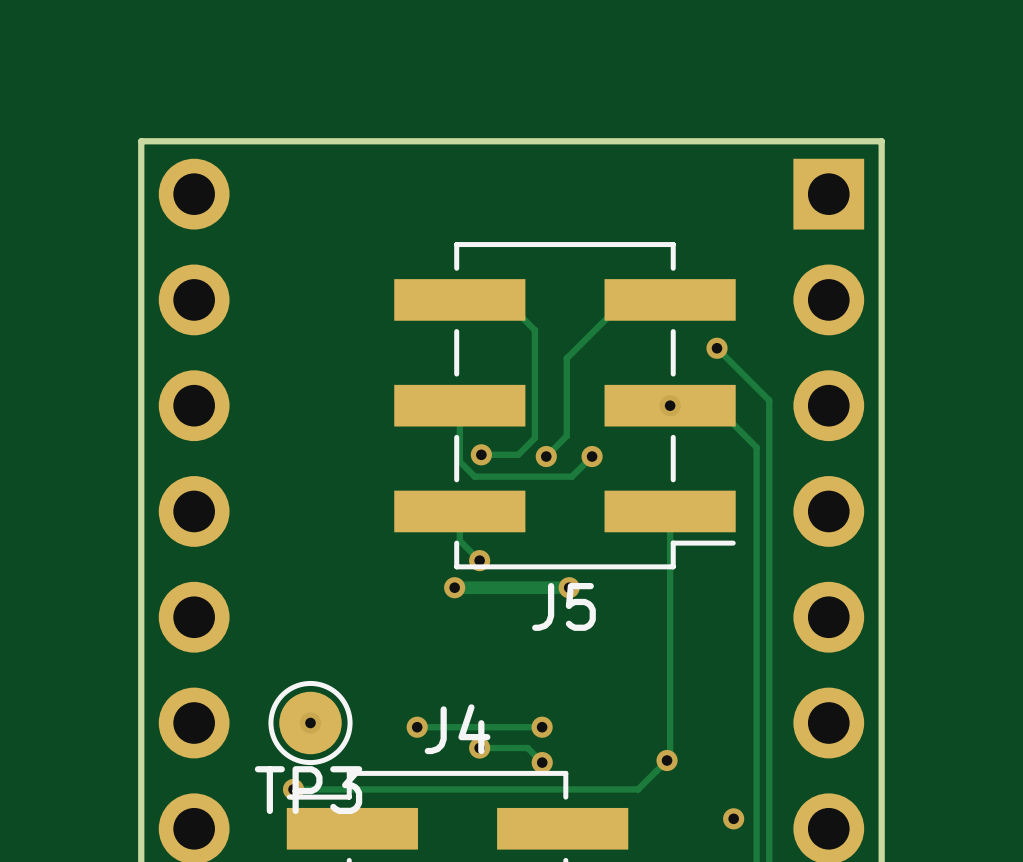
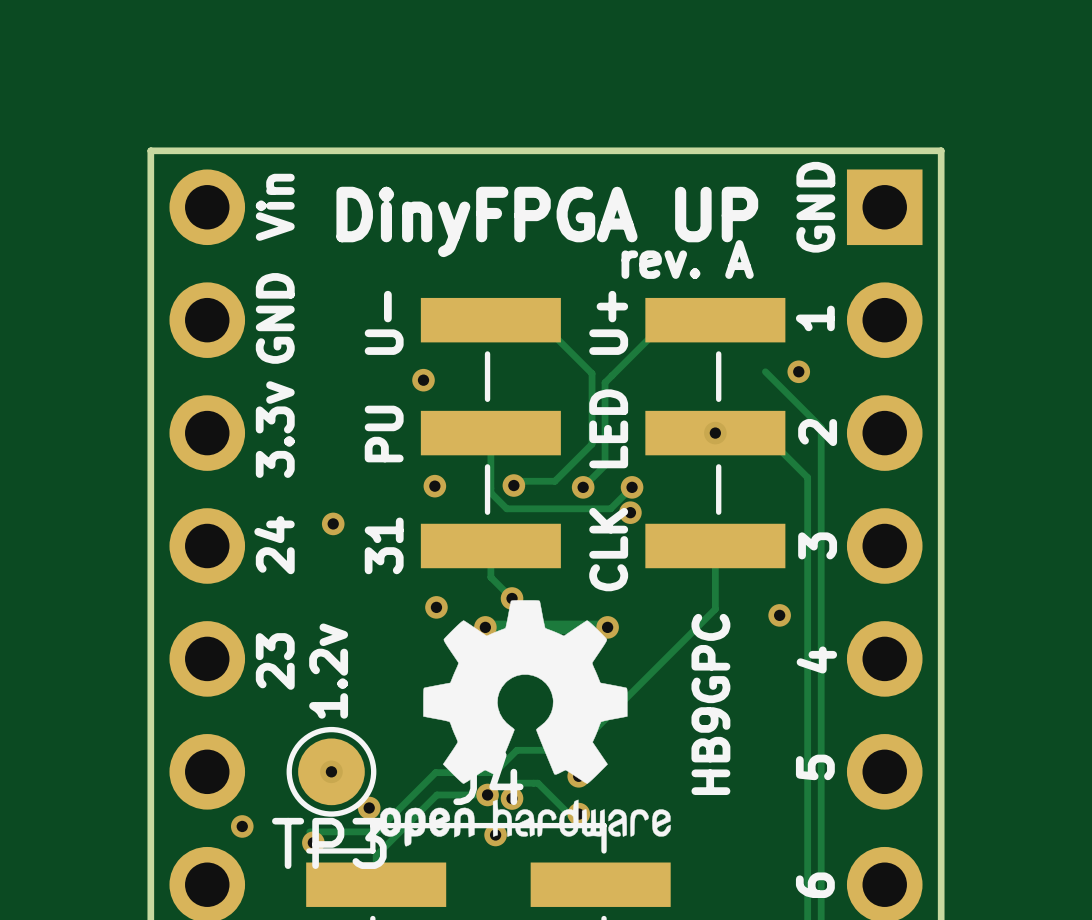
text: none -> Vin (275, 207)
text: none -> GND (815, 207)
text: none -> DinyFPGA UP (547, 221)
text: none -> rev. A (687, 259)
text: none -> GND (275, 318)
text: none -> 1 (815, 318)
text: none -> U- (384, 322)
text: none -> U+ (608, 322)
track: (534, 330) (534, 438) (518, 454) (481, 454) -> (571, 352) (592, 373) (592, 444) (554, 481) (514, 481)
via position: (717, 348) -> (798, 371)
via: none -> (423, 380)
text: none -> LED (608, 428)
text: none -> 3.3v (275, 429)
J5: (564, 405) -> none
text: none -> 2 (817, 432)
text: none -> PU (384, 434)
via: none -> (434, 486)
via: none -> (630, 512)
via: none -> (333, 523)
text: none -> 24 (274, 545)
text: none -> 31 (384, 545)
text: none -> 3 (817, 545)
text: none -> CLK (608, 549)
drawing: none -> [379, 600, 671, 847]
via: none -> (436, 607)
track: (670, 570) (670, 757) (638, 789) (293, 789) -> (715, 609) (574, 750) (516, 750) (494, 772) (435, 772) (376, 831) (309, 831)
via: none -> (779, 615)
text: none -> 4 (816, 659)
text: none -> 23 (275, 661)
text: none -> 1.2v (328, 671)
text: none -> HB9GPC (710, 704)
text: none -> 5 (815, 767)
via: (417, 727) -> none
track: (542, 727) (417, 727) -> none
track: none -> (517, 783) (537, 783) (579, 824)
track: none -> (487, 794) (436, 794) (376, 855) (376, 884)
via: none -> (487, 794)
track: (479, 748) (527, 748) (542, 762) (544, 762) -> none
via: none -> (369, 807)
via: (667, 760) -> none
via: none -> (242, 826)
via: none -> (495, 834)
via: (733, 818) -> none
text: none -> 6 (815, 885)

